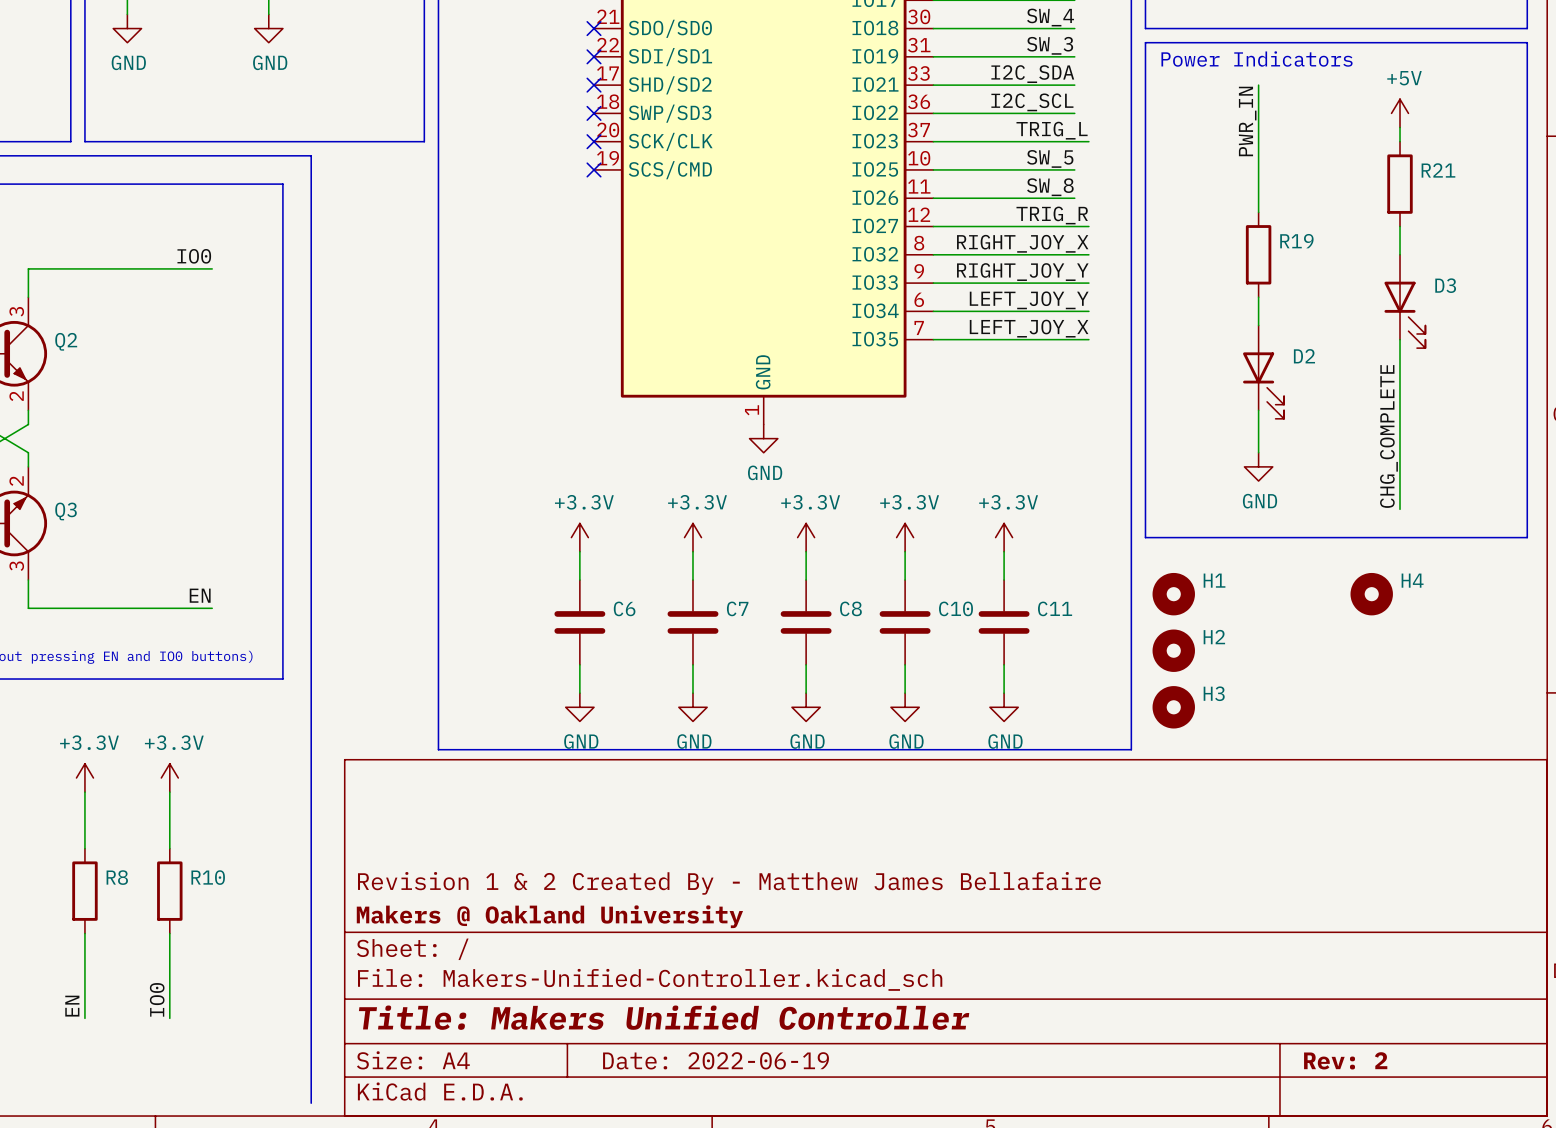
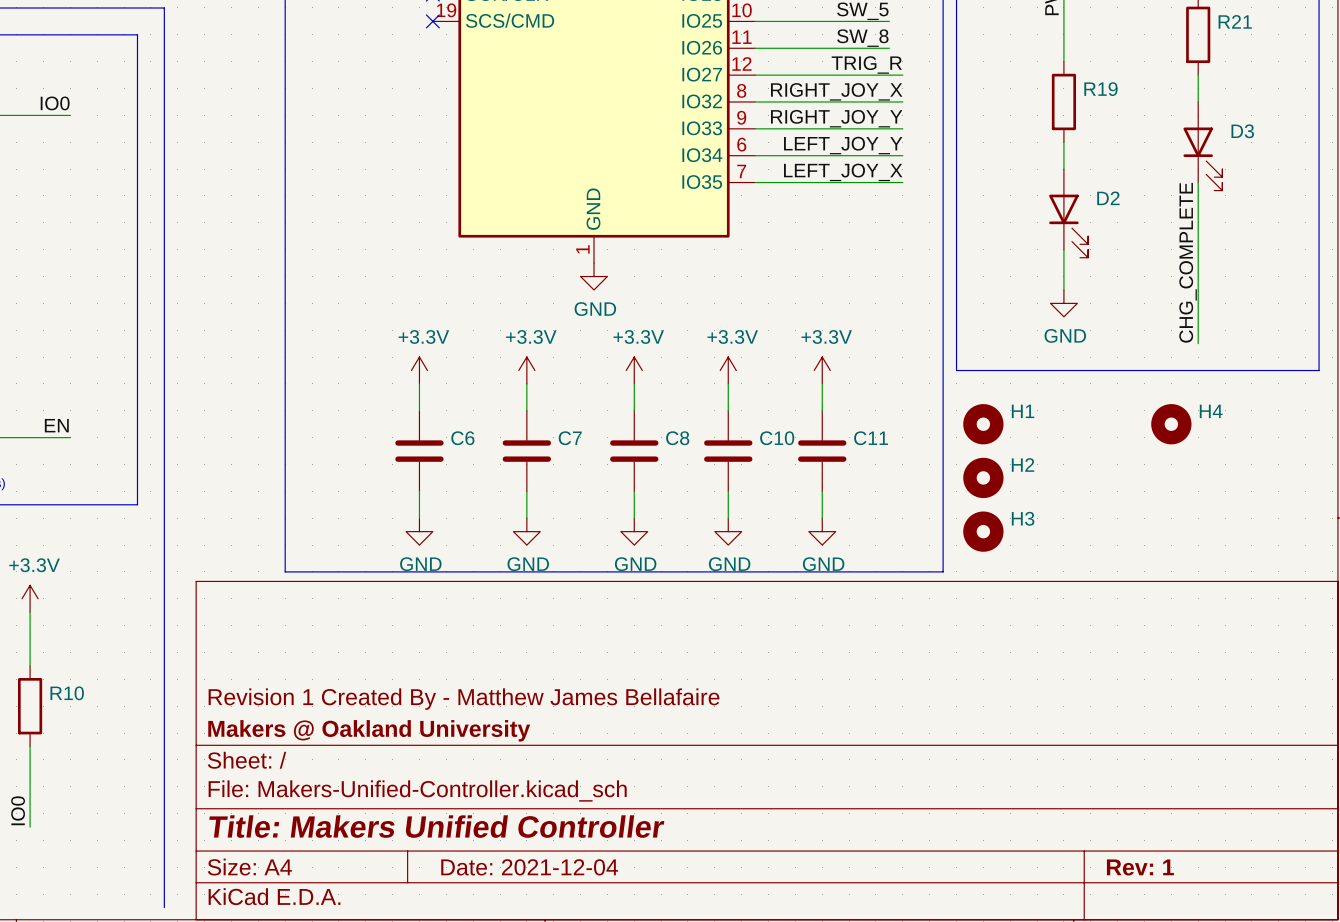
title block: Revision 1 & 2 Created By - Matthew James Bellafaire (729, 883) -> Revision 1 Created By - Matthew James Bellafaire (464, 699)
title block: Date: 2022-06-19 (716, 1060) -> Date: 2021-12-04 (529, 867)
title block: Rev: 2 (1345, 1060) -> Rev: 1 (1140, 867)

